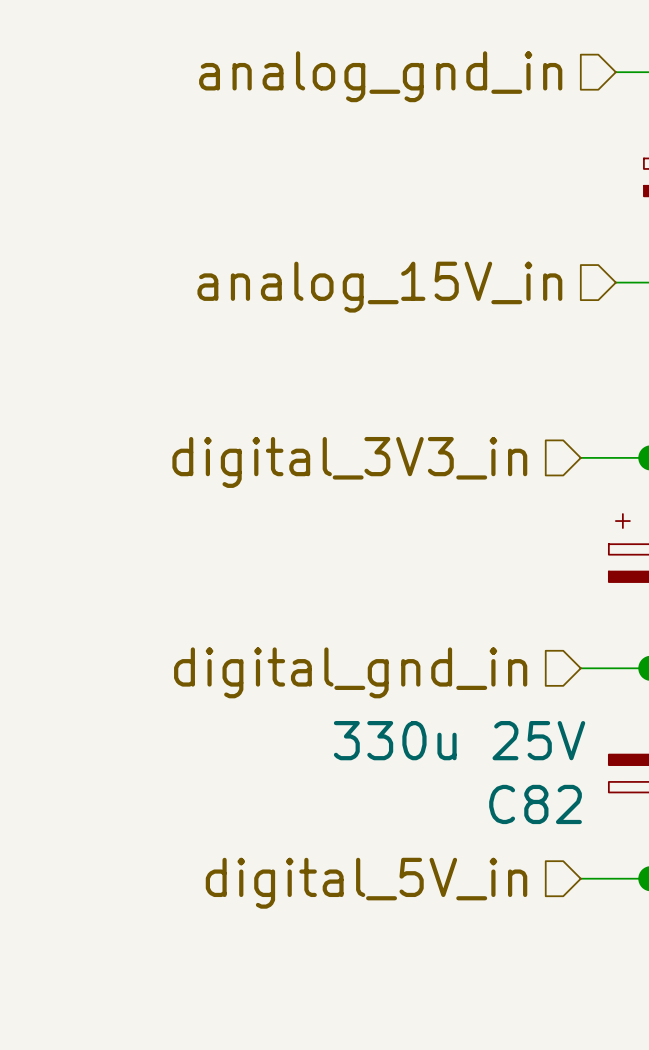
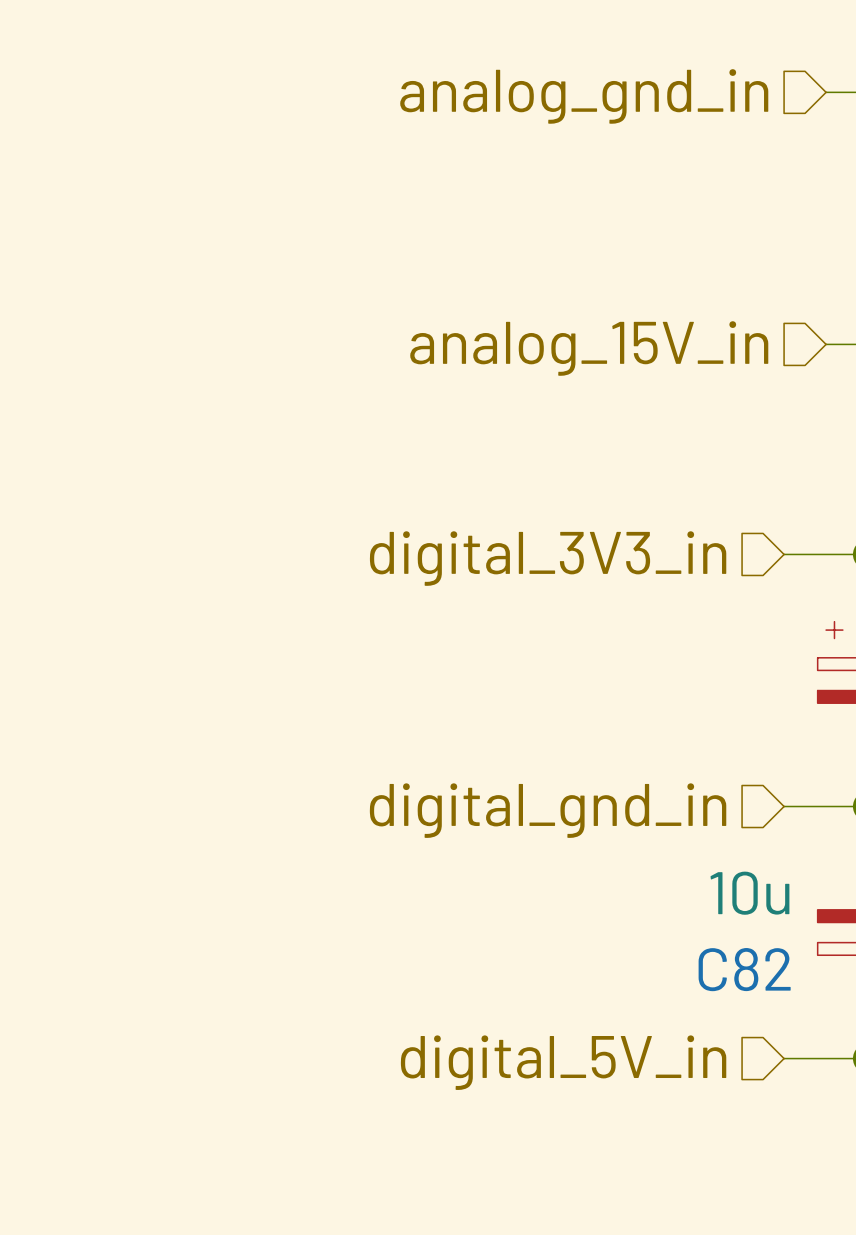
C82 value: 330u 25V (459, 740) -> 10u (749, 893)

